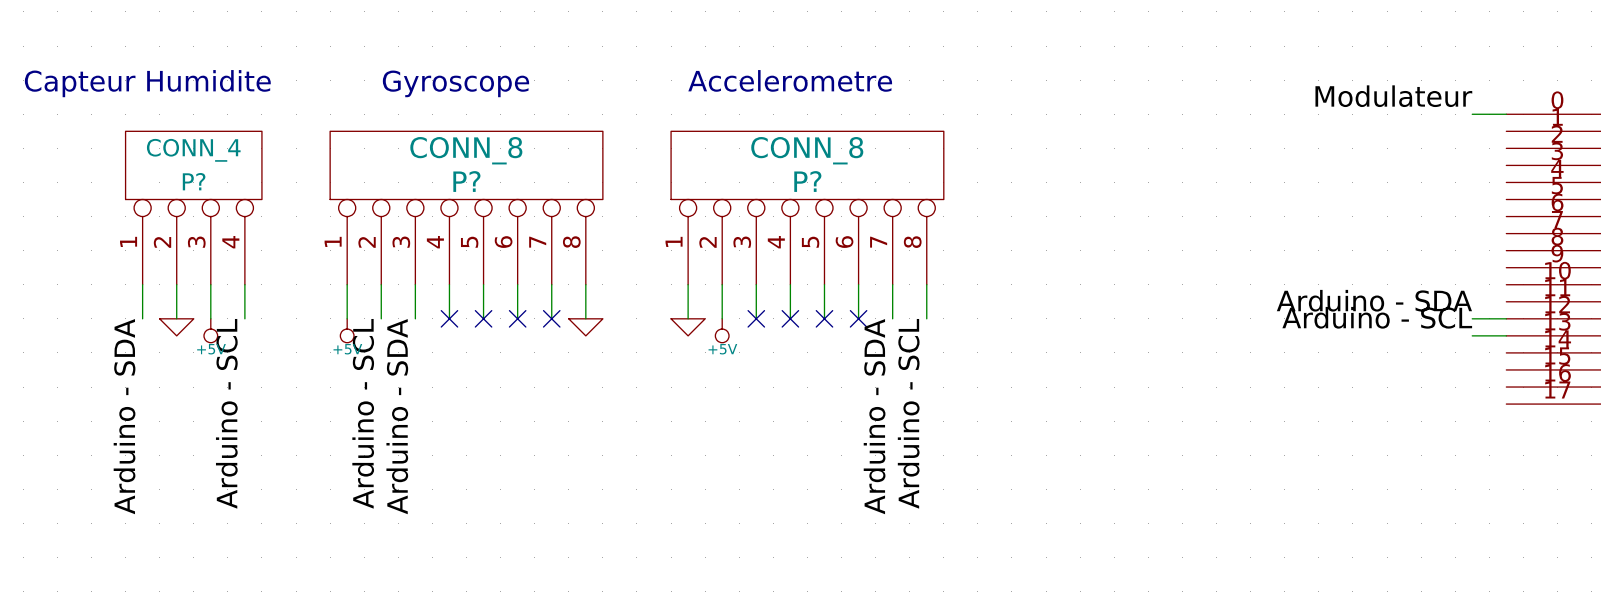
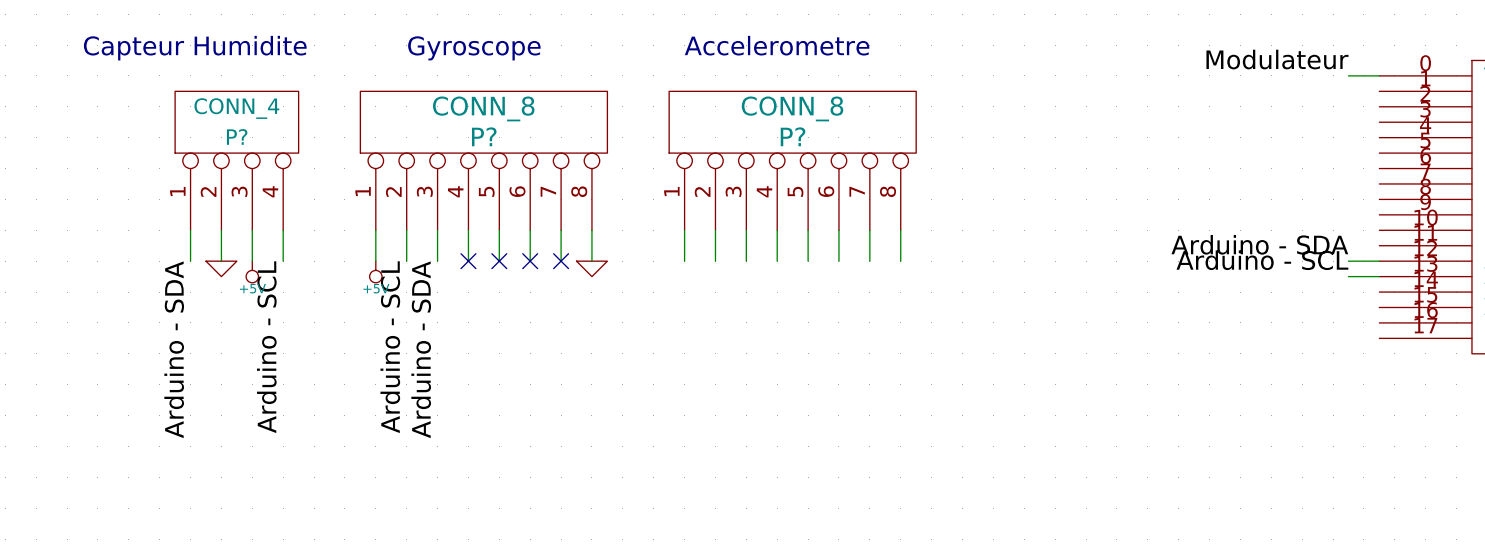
text position: Accelerometre (790, 80) -> Accelerometre (777, 45)
text position: Capteur Humidite (147, 83) -> Capteur Humidite (195, 48)
text position: Gyroscope (455, 83) -> Gyroscope (474, 48)
P? position: (193, 208) -> (236, 160)
P? position: (466, 208) -> (483, 160)
P? position: (807, 208) -> (792, 160)
wire: (142, 284) (142, 318) -> (190, 230) (190, 261)
wire: (176, 284) (176, 318) -> (221, 230) (221, 261)
wire: (210, 284) (210, 318) -> (252, 230) (252, 261)
wire: (244, 284) (244, 318) -> (283, 230) (283, 261)
wire: (347, 284) (347, 318) -> (375, 230) (375, 261)
wire: (381, 284) (381, 318) -> (406, 230) (406, 261)
wire: (415, 284) (415, 318) -> (437, 230) (437, 261)
wire: (449, 284) (449, 318) -> (468, 230) (468, 261)
wire: (483, 284) (483, 318) -> (499, 230) (499, 261)
wire: (517, 284) (517, 318) -> (530, 230) (530, 261)
wire: (551, 284) (551, 318) -> (561, 230) (561, 261)
wire: (585, 284) (585, 318) -> (591, 230) (591, 261)
wire: (688, 284) (688, 318) -> (684, 230) (684, 261)
wire: (722, 284) (722, 318) -> (715, 230) (715, 261)
wire: (756, 284) (756, 318) -> (746, 230) (746, 261)
wire: (790, 284) (790, 318) -> (777, 230) (777, 261)
wire: (824, 284) (824, 318) -> (808, 230) (808, 261)
wire: (858, 284) (858, 318) -> (838, 230) (838, 261)
wire: (892, 284) (892, 318) -> (869, 230) (869, 261)
wire: (926, 284) (926, 318) -> (900, 230) (900, 261)
no-connect mark: (449, 318) -> none
no-connect mark: (483, 318) -> none
no-connect mark: none -> (468, 261)
no-connect mark: (517, 318) -> none
no-connect mark: none -> (499, 261)
no-connect mark: (551, 318) -> none
no-connect mark: none -> (530, 261)
no-connect mark: none -> (561, 261)
no-connect mark: (756, 318) -> none
no-connect mark: (790, 318) -> none
no-connect mark: (824, 318) -> none
no-connect mark: (858, 318) -> none
power symbol position: (176, 327) -> (221, 268)
power symbol: (585, 327) -> none
power symbol: none -> (591, 268)
power symbol: (688, 327) -> none
power symbol: +5V (210, 330) -> none
power symbol: none -> +5V (252, 271)
power symbol: +5V (347, 330) -> none
power symbol: none -> +5V (375, 271)
power symbol: +5V (722, 330) -> none
label: Arduino - SCL (226, 413) -> none
label: none -> Arduino - SCL (266, 347)
label: Arduino - SCL (363, 413) -> none
label: none -> Arduino - SCL (390, 347)
label: Arduino - SCL (908, 413) -> none
label position: Arduino - SDA (124, 416) -> Arduino - SDA (174, 349)
label position: Arduino - SDA (397, 416) -> Arduino - SDA (421, 349)
label: Arduino - SDA (874, 416) -> none

